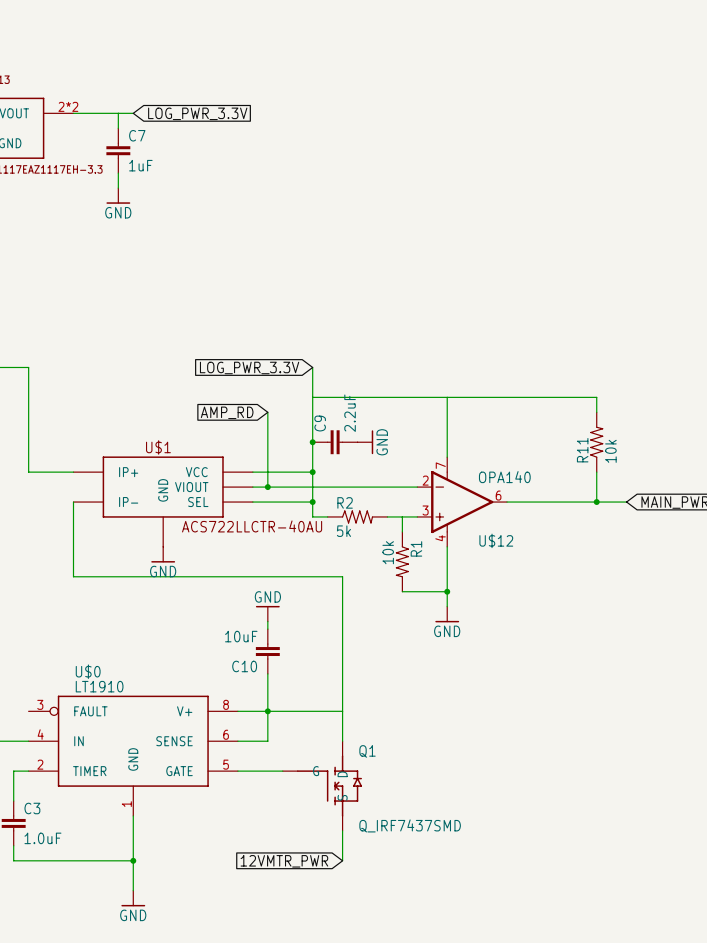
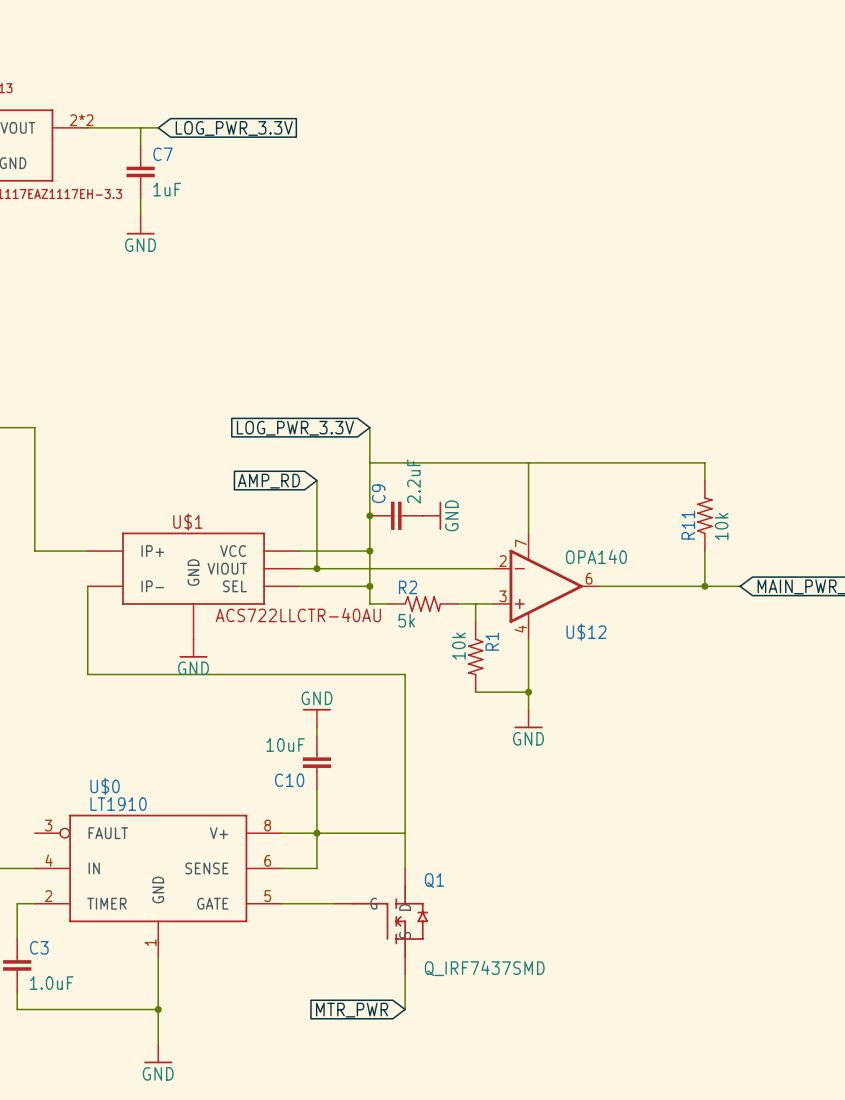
global label: 12VMTR_PWR (284, 861) -> MTR_PWR (352, 1010)

